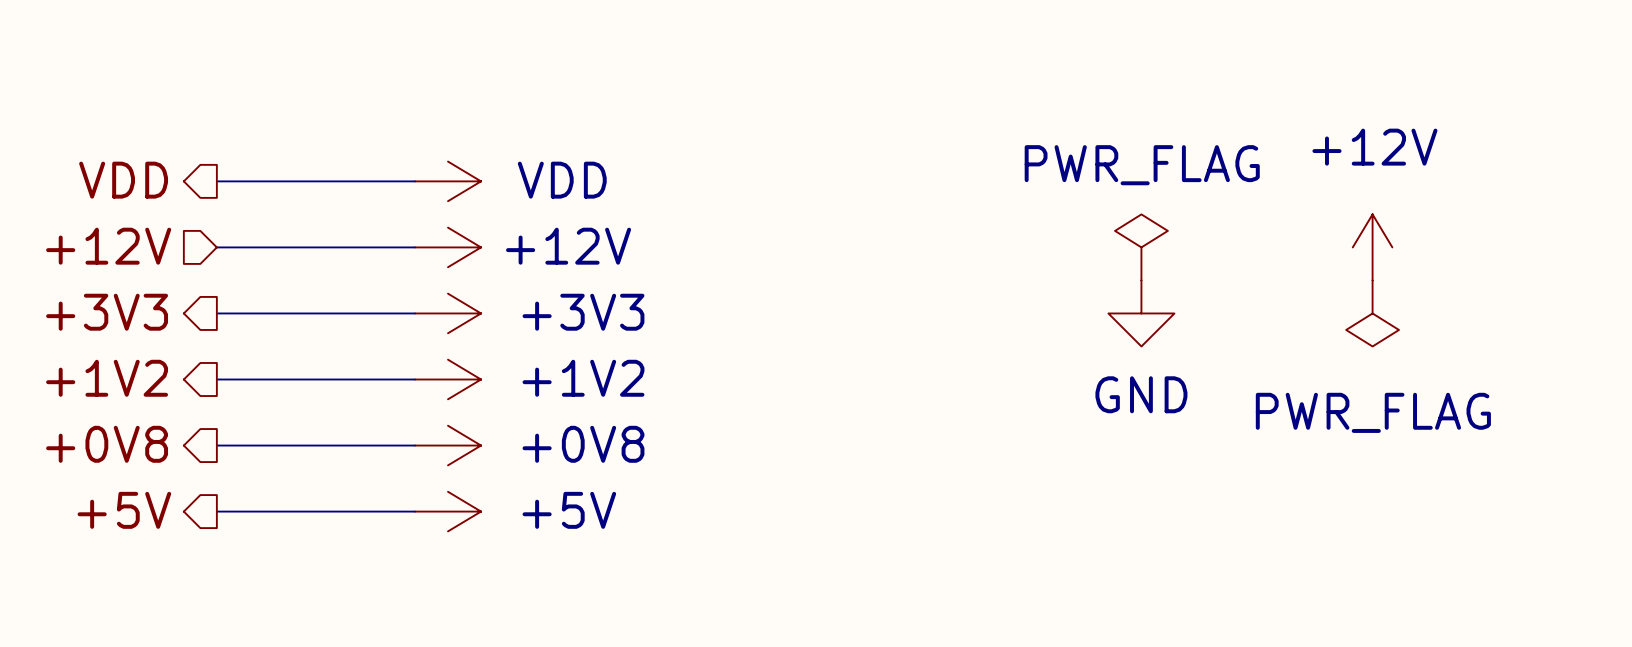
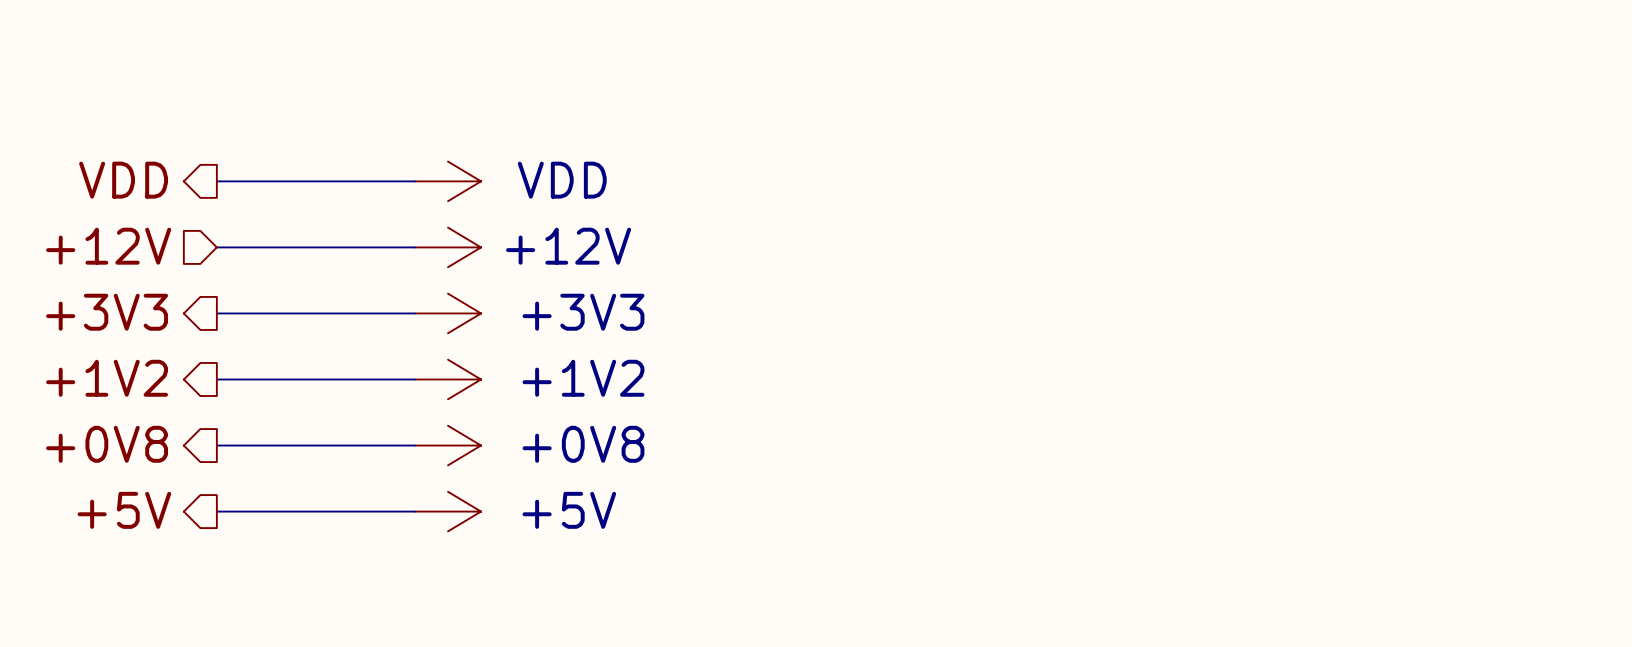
power symbol: PWR_FLAG (1141, 247) -> none
power symbol: +12V (1372, 247) -> none
power symbol: GND (1141, 313) -> none
power symbol: PWR_FLAG (1372, 313) -> none

